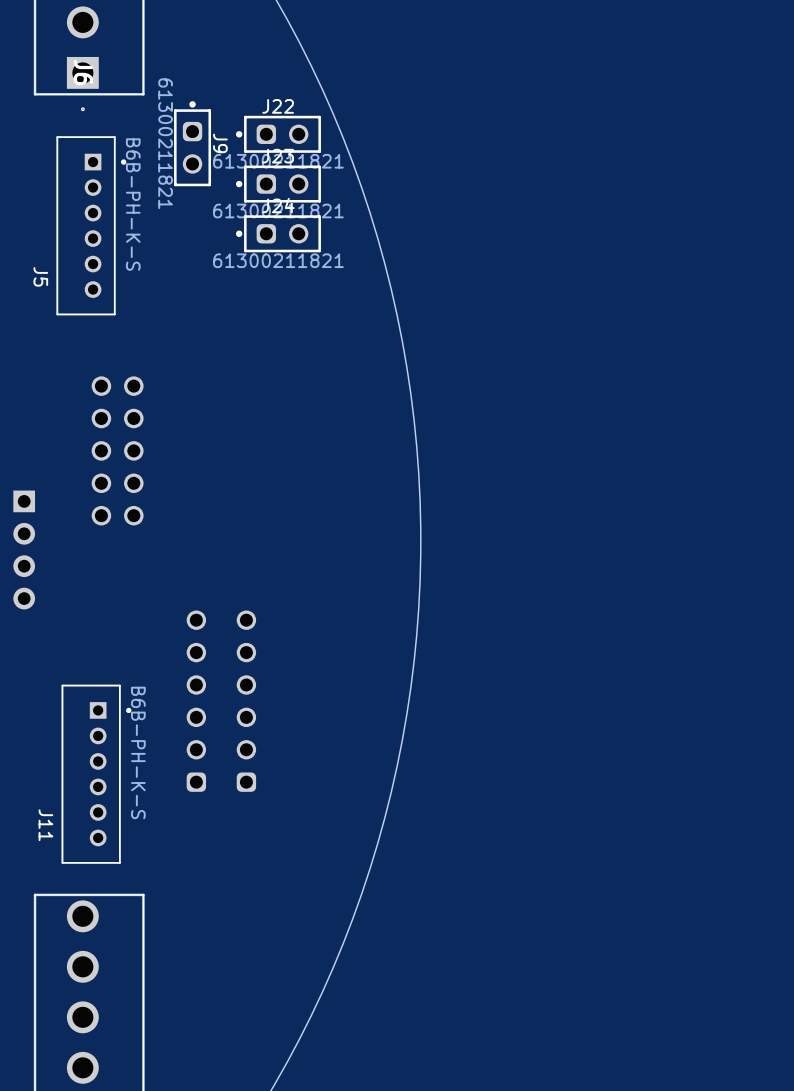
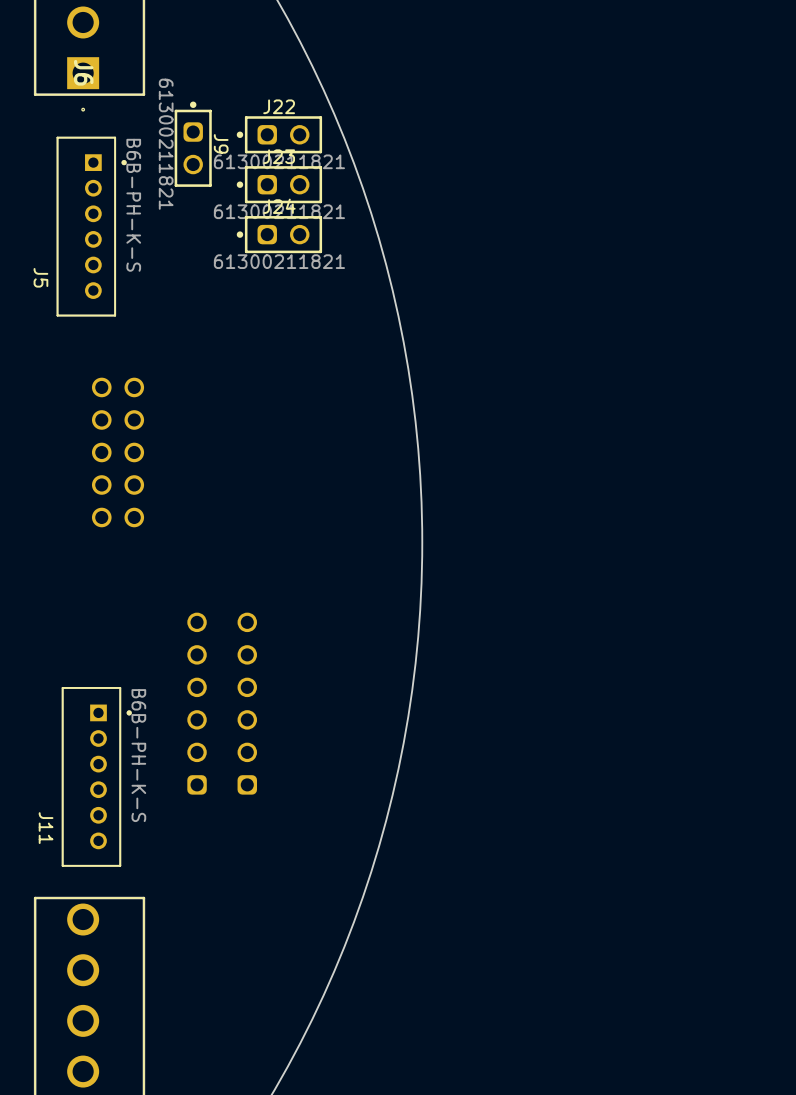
part: (24, 549) -> none

